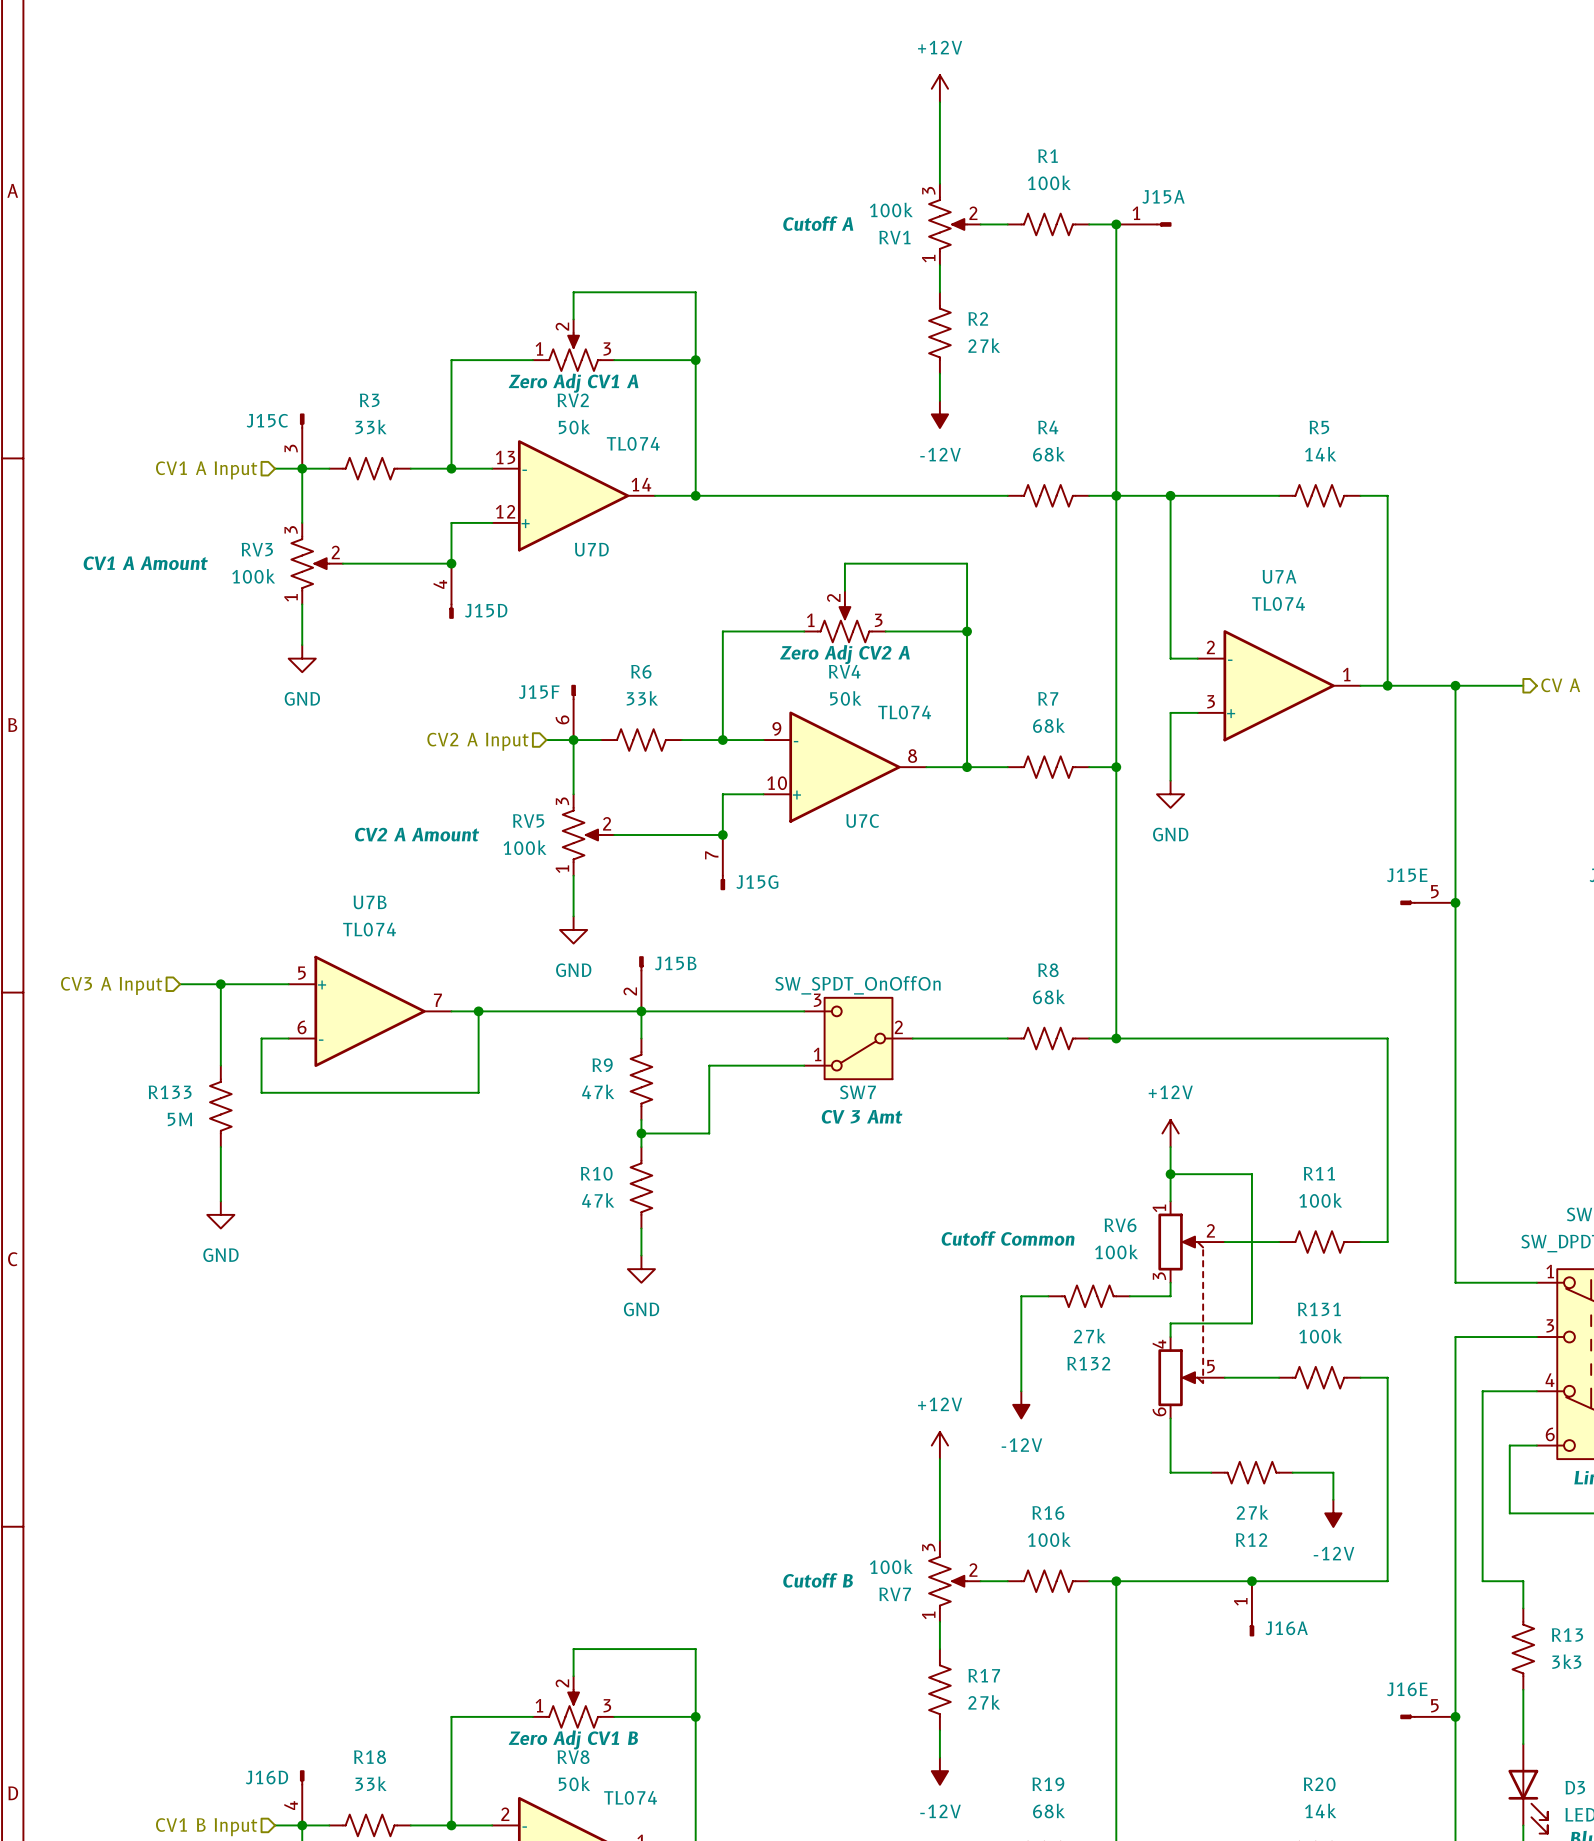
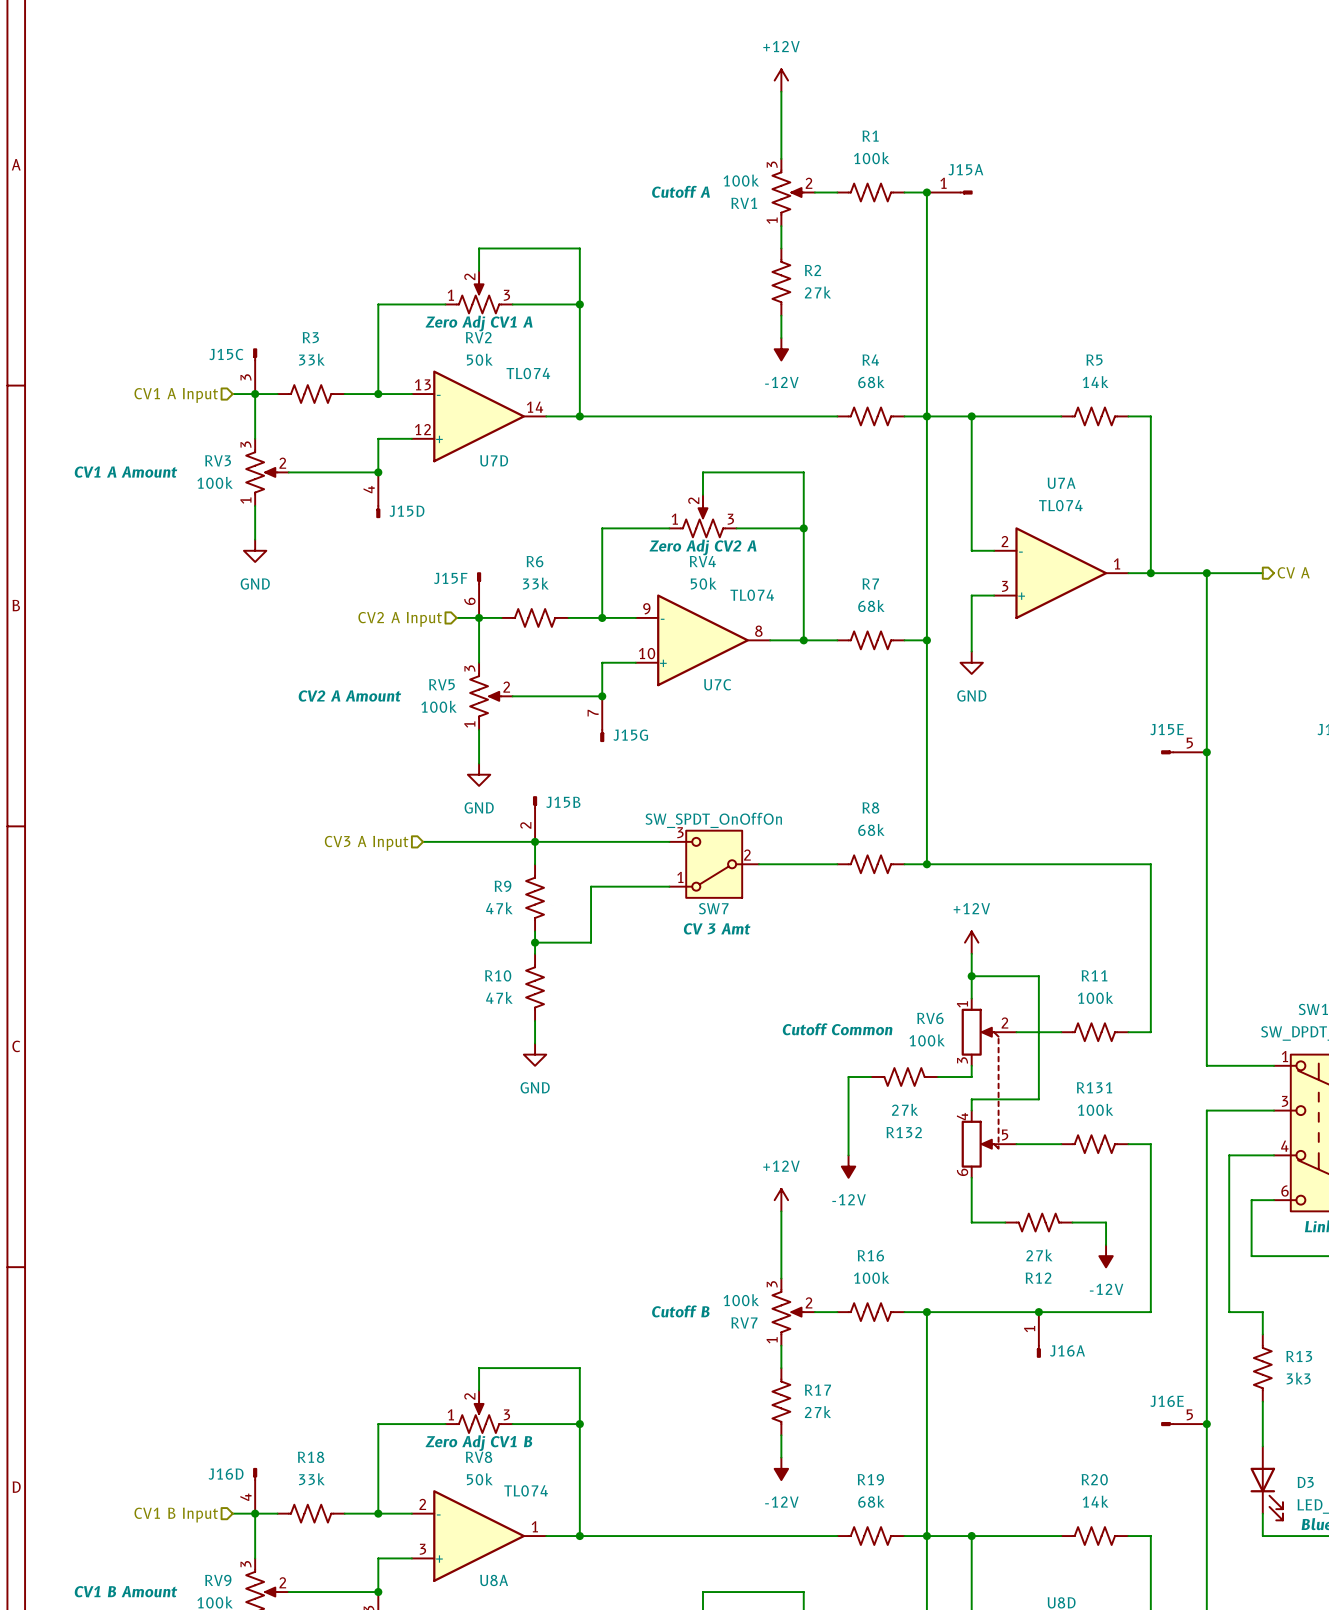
wire: (180, 984) (288, 984) -> none
wire: (220, 984) (220, 1065) -> none
junction: (220, 984) -> none
hierarchical label: CV3 A Input (111, 985) -> none
U7B: TL074 (370, 1011) -> none
wire: (451, 1011) (505, 1011) -> none
wire: (478, 1011) (478, 1092) (261, 1092) (261, 1038) (288, 1038) -> none
junction: (478, 1011) -> none
hierarchical label: none -> CV3 A Input (366, 843)
R133: 5M (220, 1106) -> none
wire: (220, 1147) (220, 1201) -> none
power symbol: GND (220, 1214) -> none

